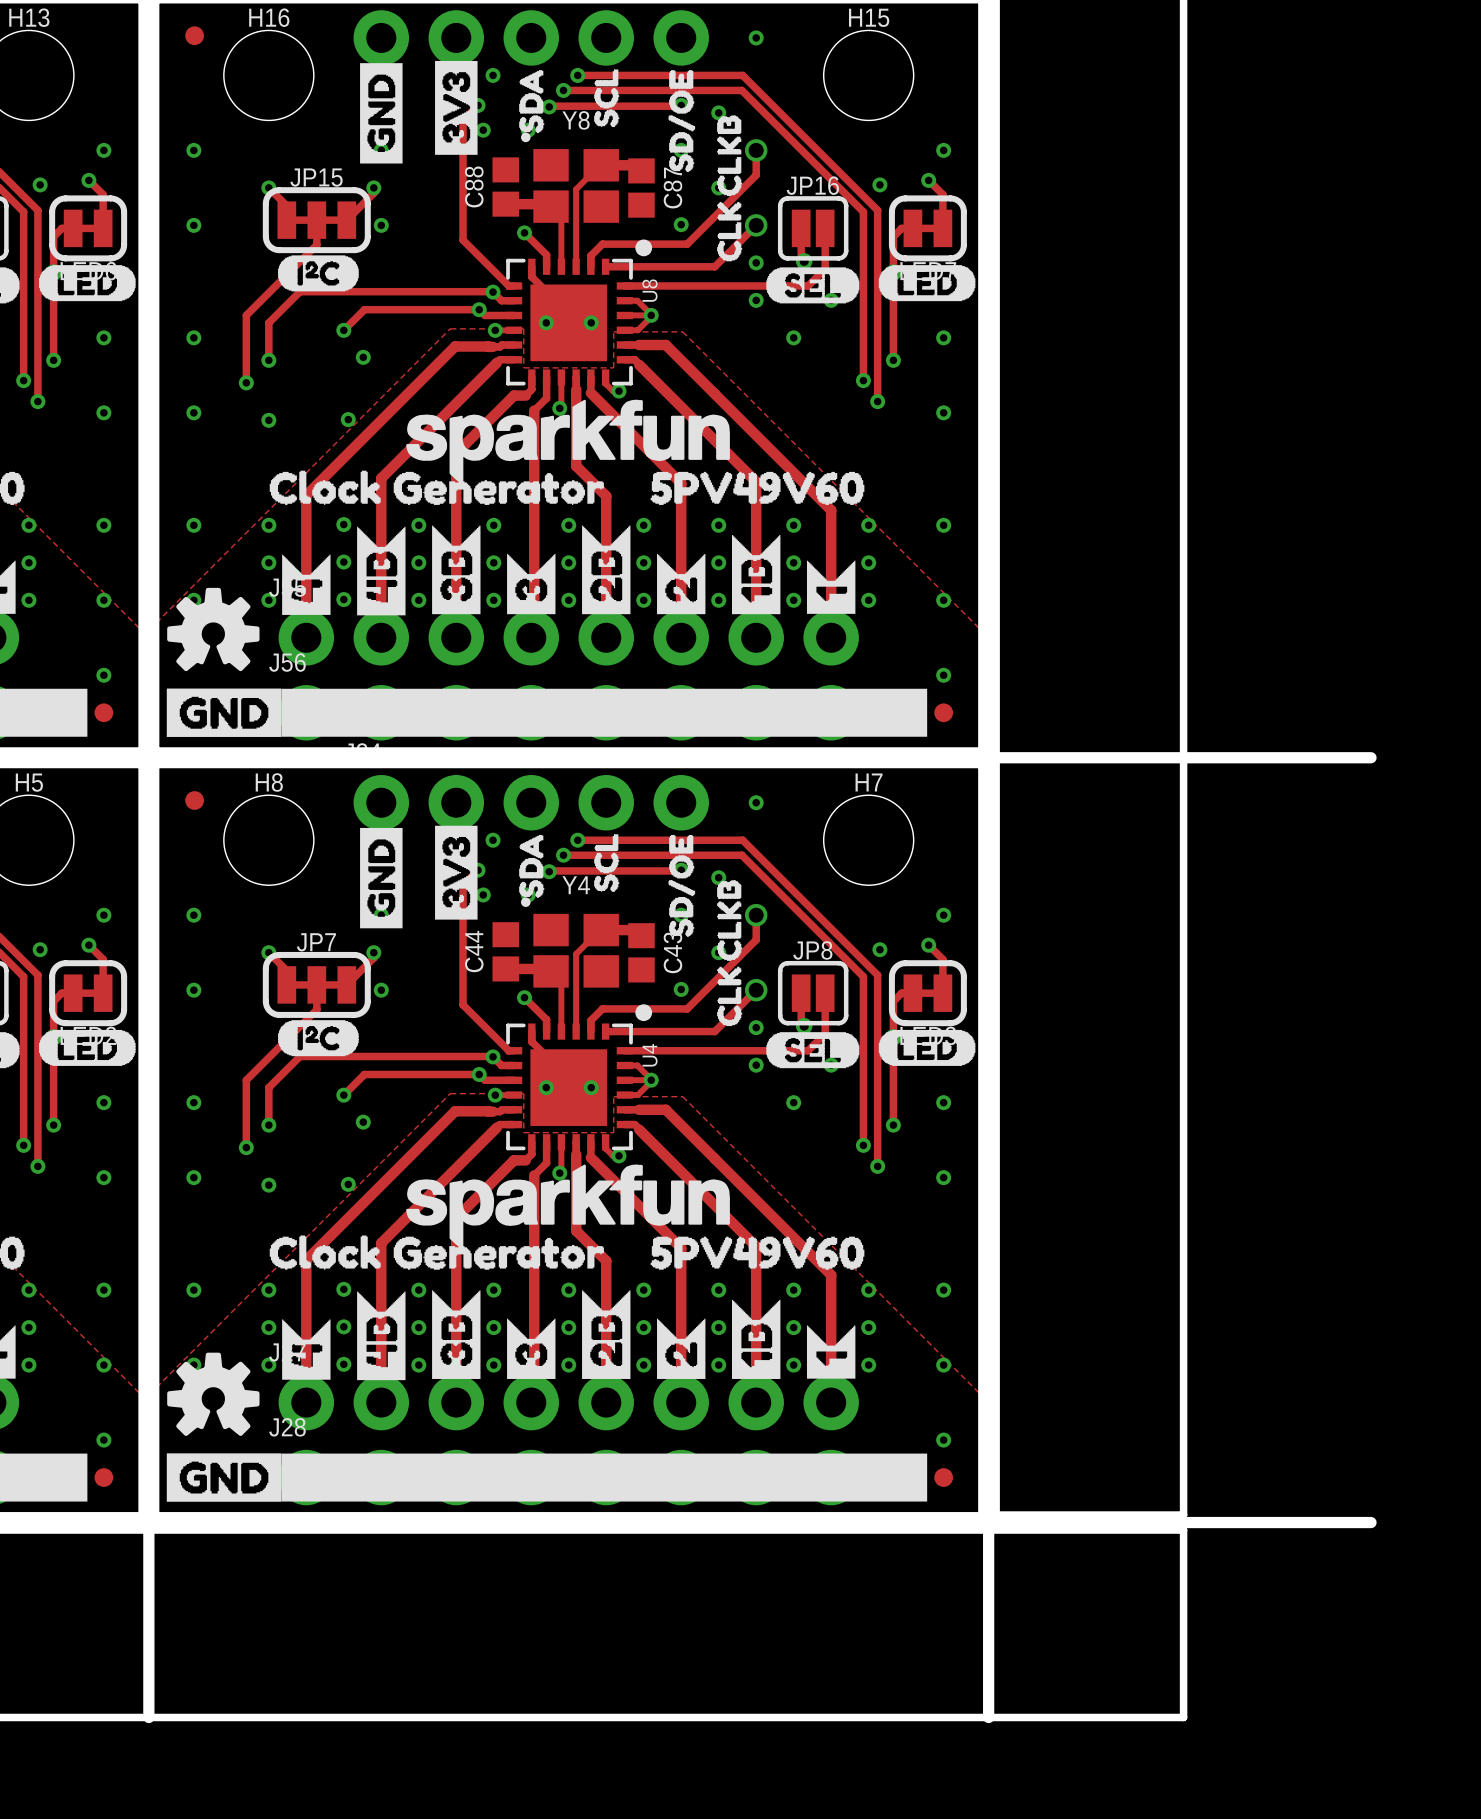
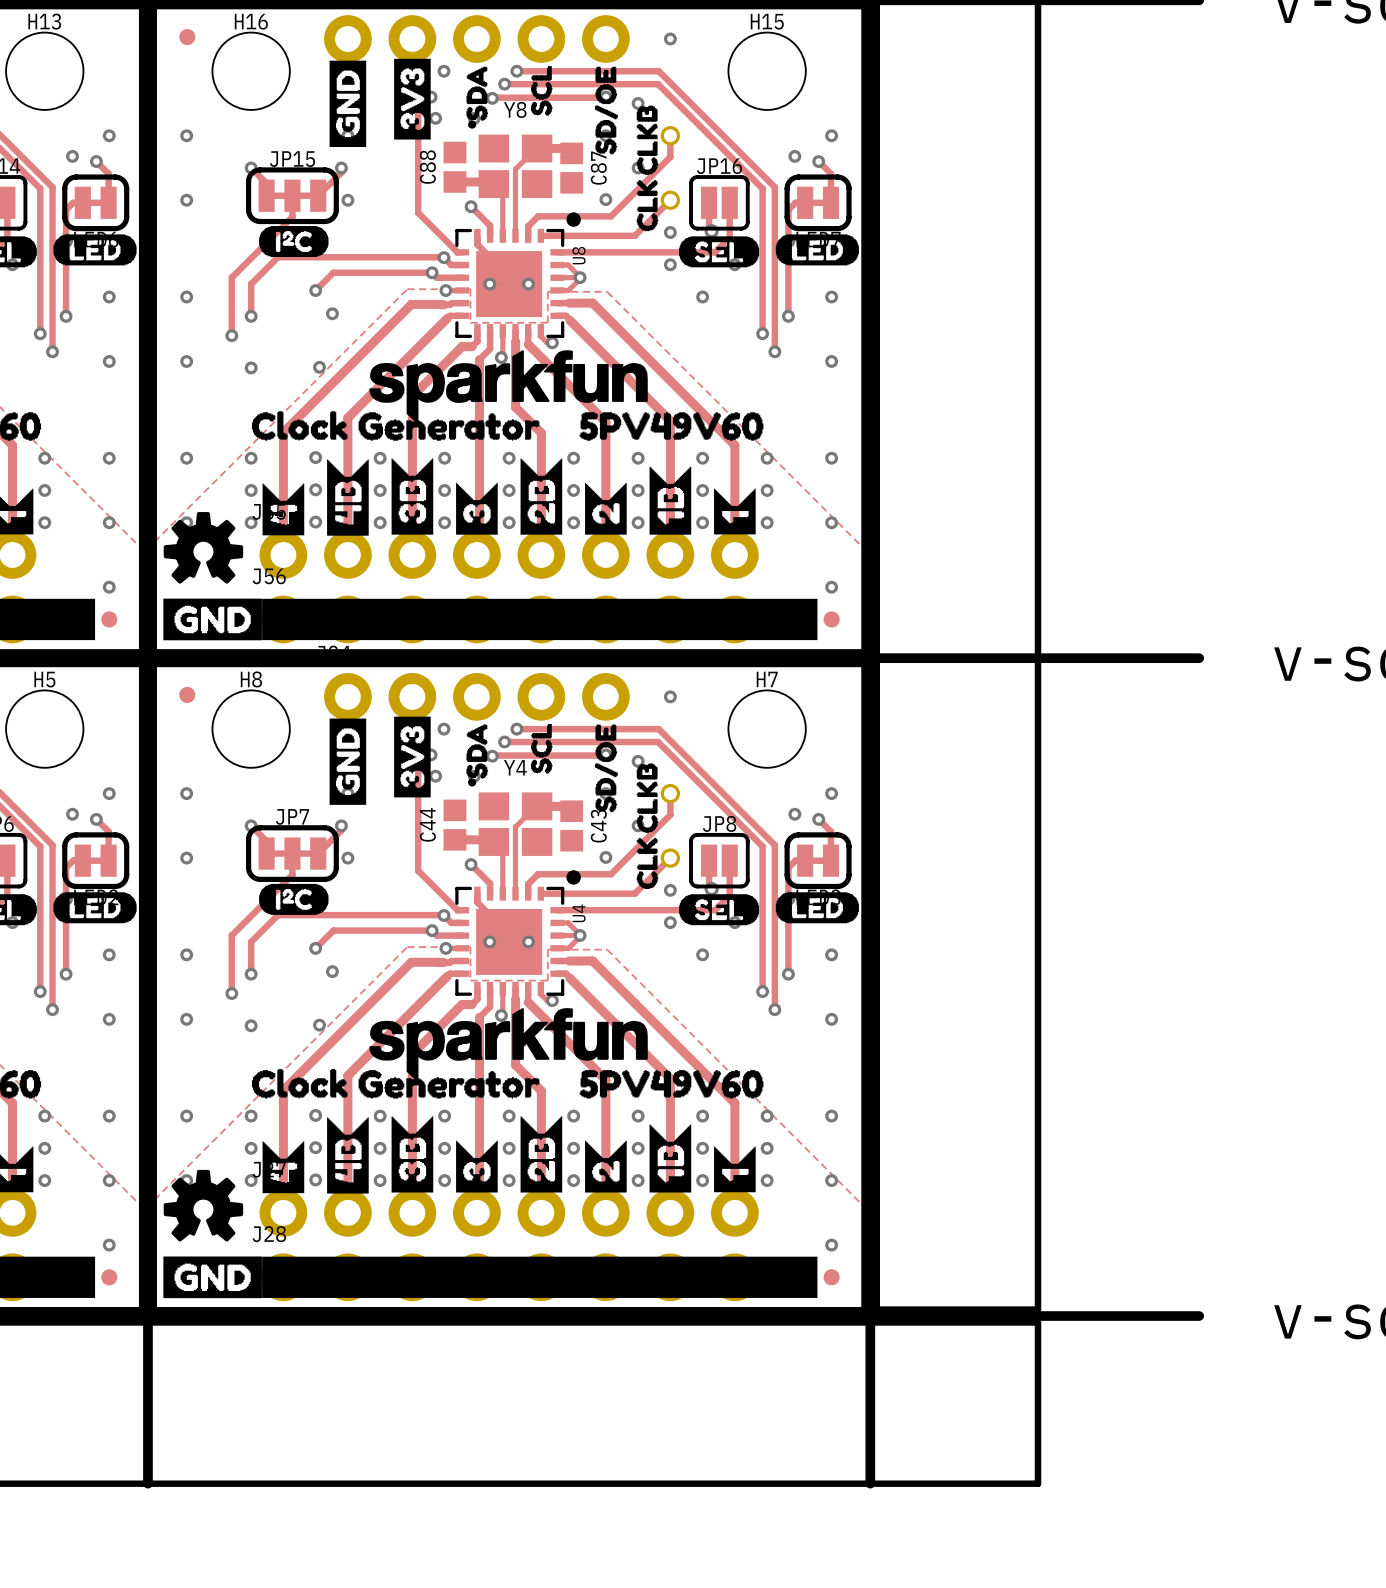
via position: (40, 184) -> (72, 156)
via position: (879, 184) -> (794, 156)
via position: (40, 949) -> (72, 814)
via position: (879, 949) -> (794, 814)

